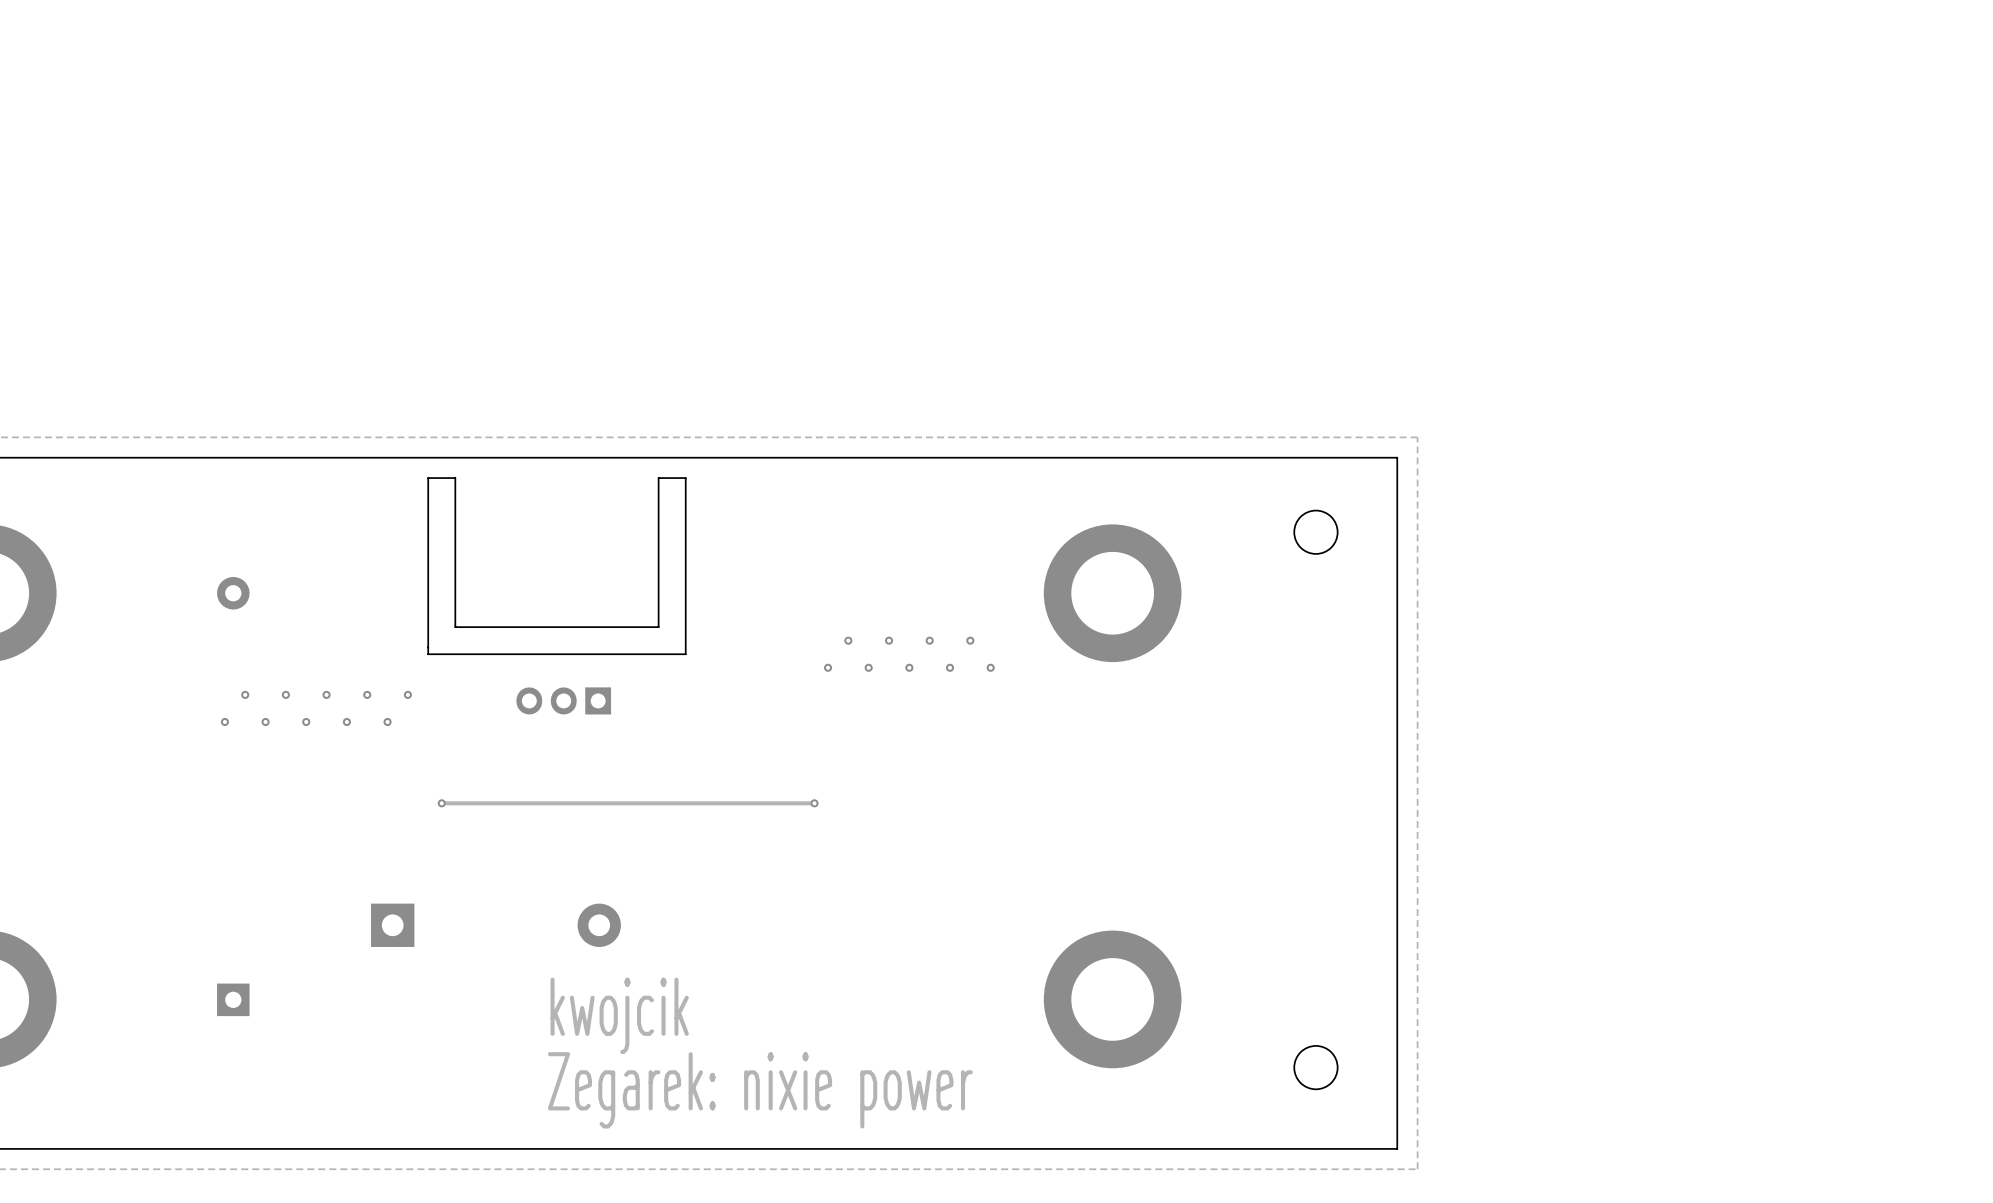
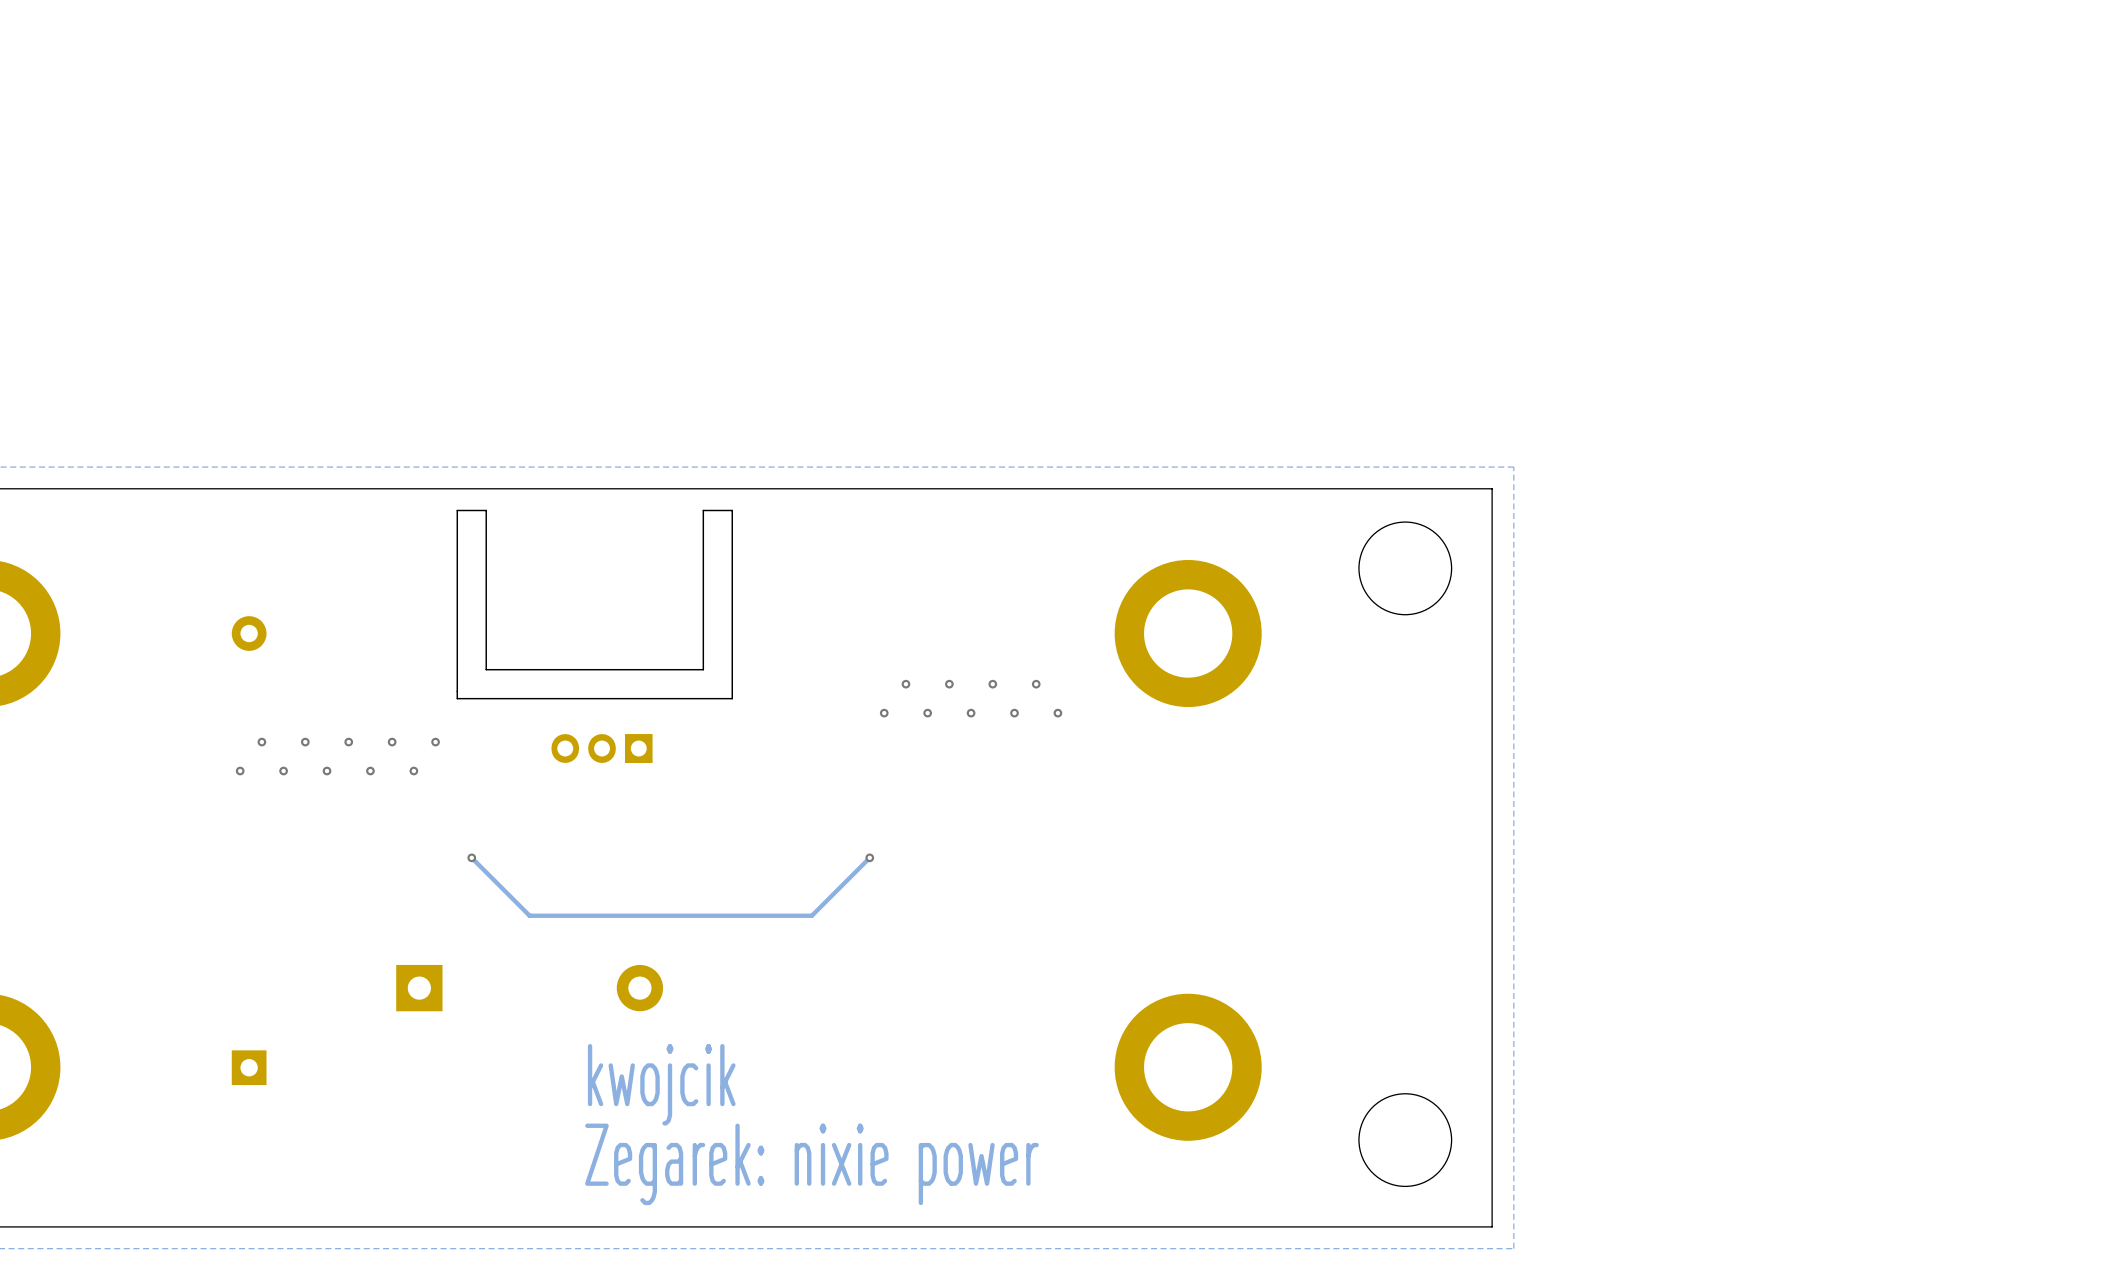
round board edge size: [1293, 510, 1338, 555] -> [1358, 521, 1452, 616]
track: (814, 803) (441, 803) -> (869, 857) (811, 915) (529, 915) (471, 857)
round board edge size: [1293, 1045, 1338, 1090] -> [1358, 1093, 1452, 1187]

